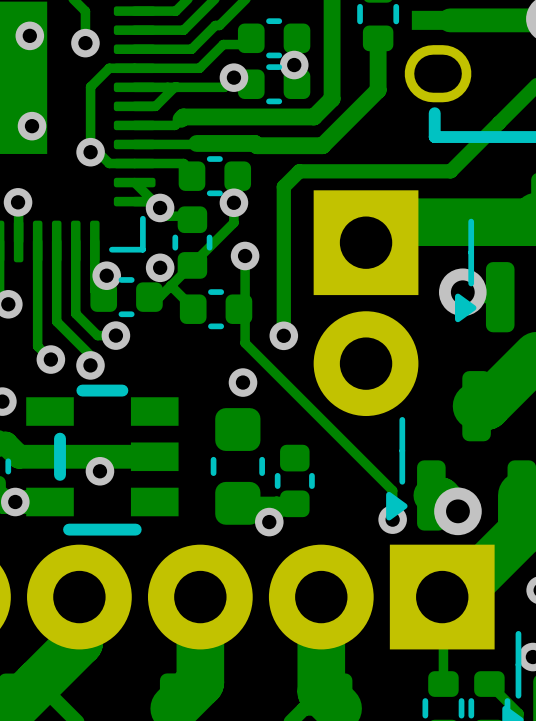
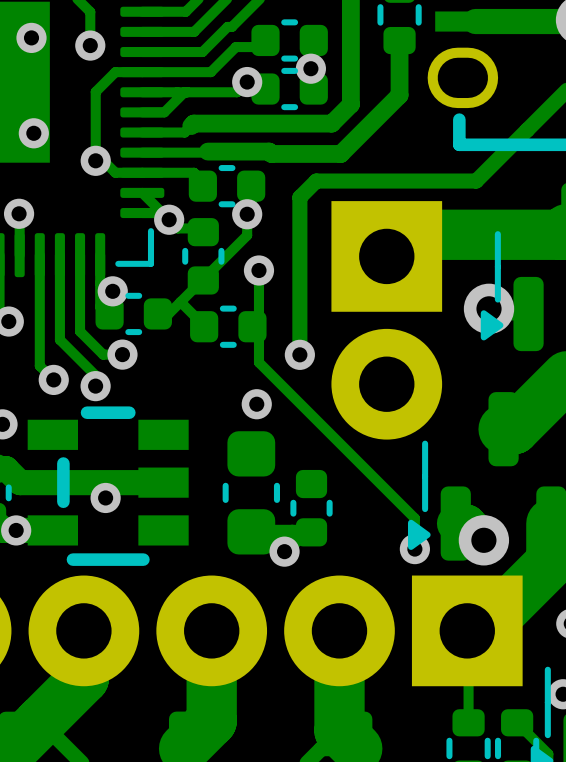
via: (160, 267) -> none

